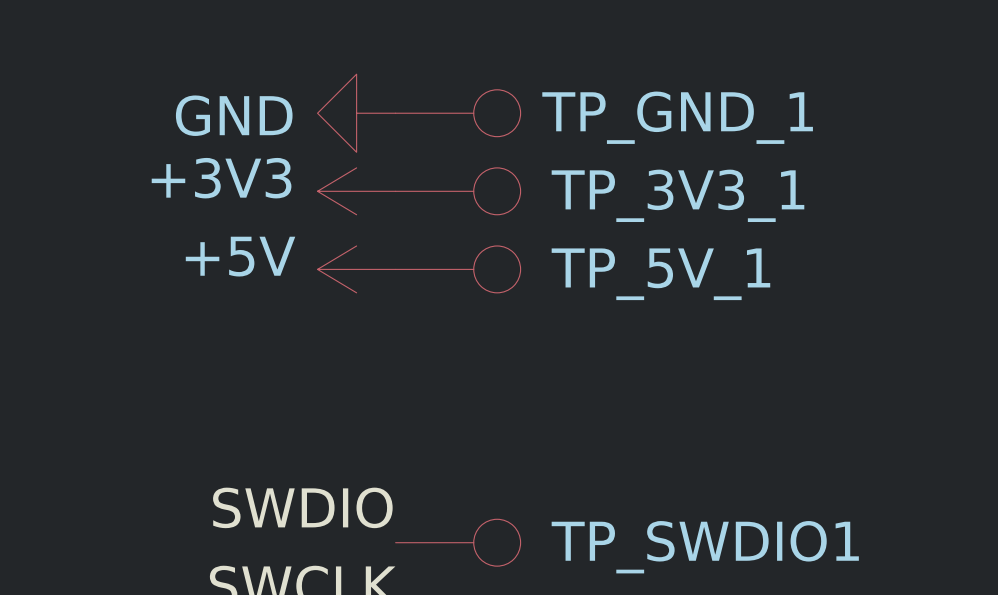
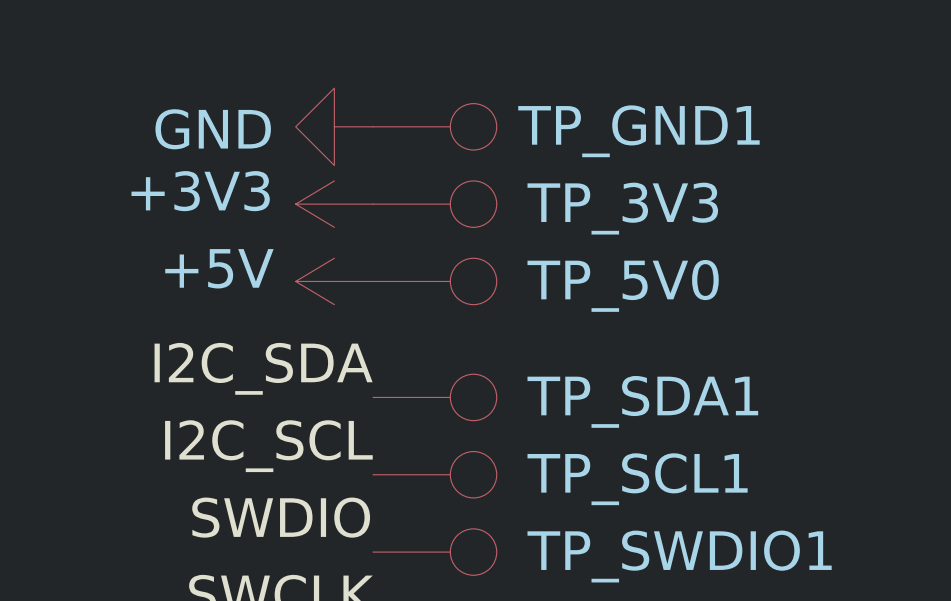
TP_GND_1 name: TP_GND_1 (677, 117) -> TP_GND1 (638, 131)
TP_3V3_1 name: TP_3V3_1 (677, 195) -> TP_3V3 (622, 208)
TP_5V_1 name: TP_5V_1 (660, 274) -> TP_5V0 (623, 285)
label: none -> I2C_SDA (263, 368)
TP_SDA1: none -> (434, 397)
label: none -> I2C_SCL (268, 446)
TP_SCL1: none -> (434, 474)

